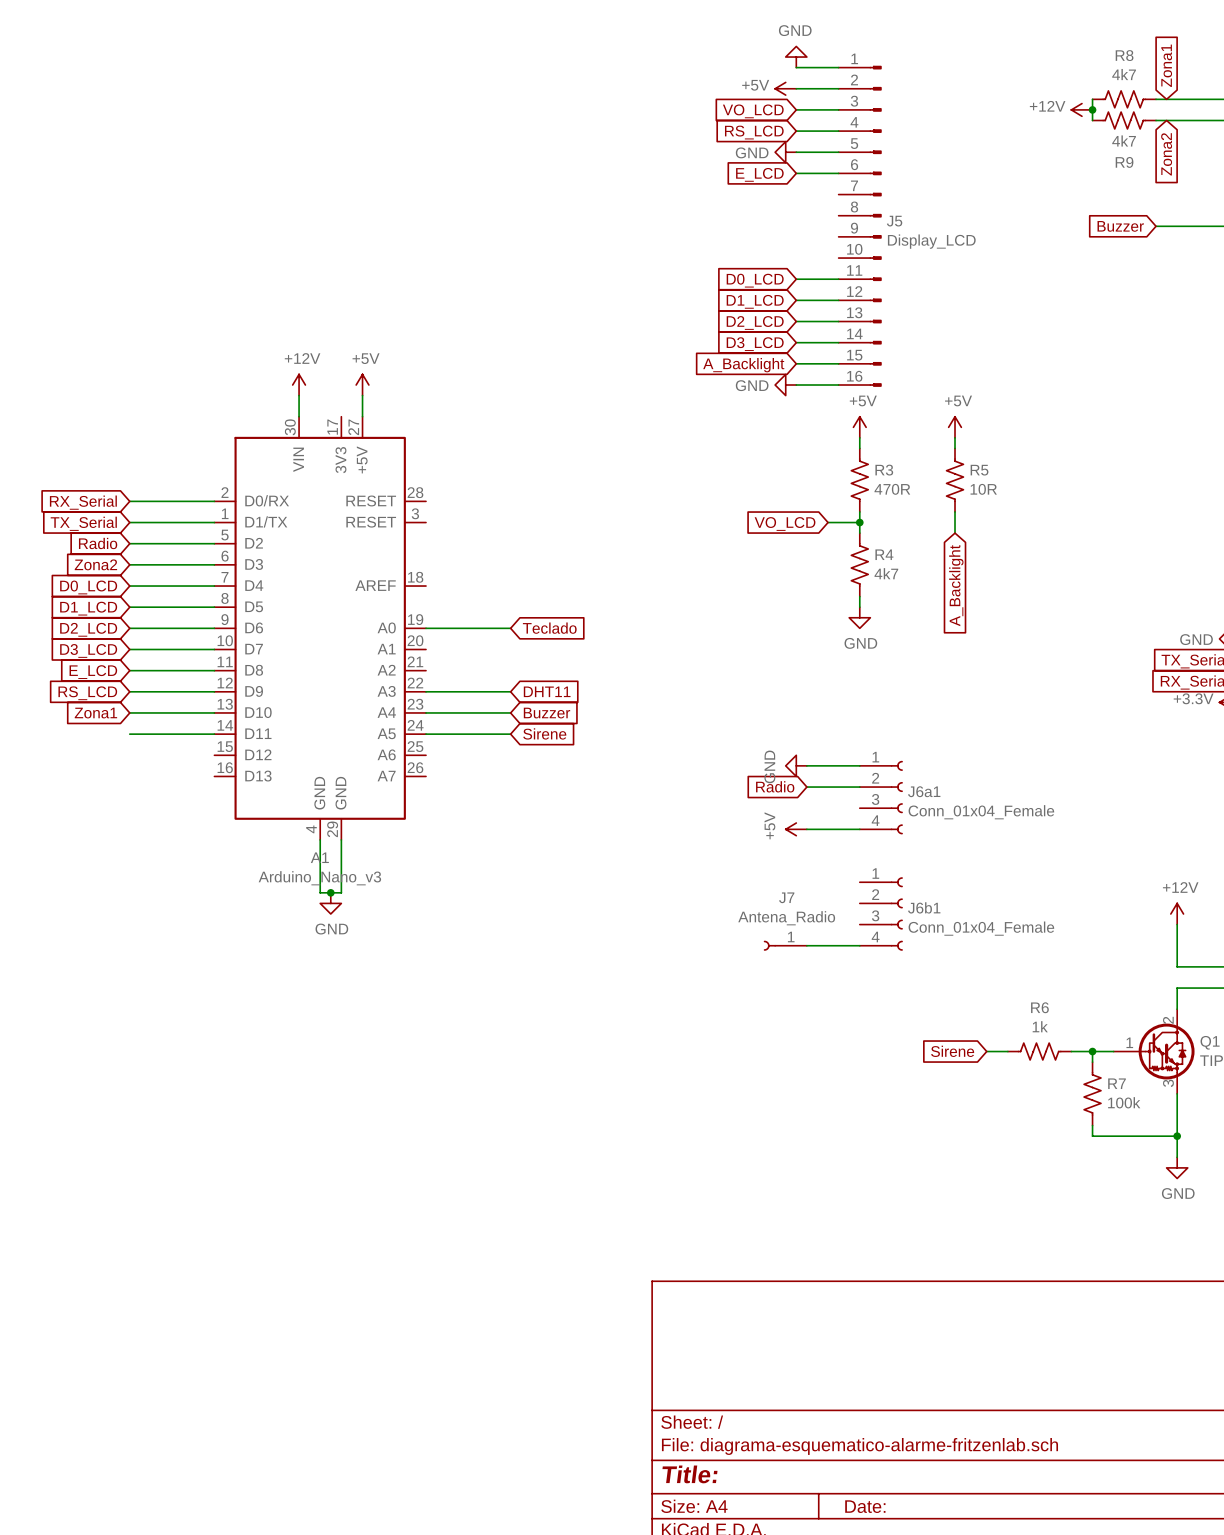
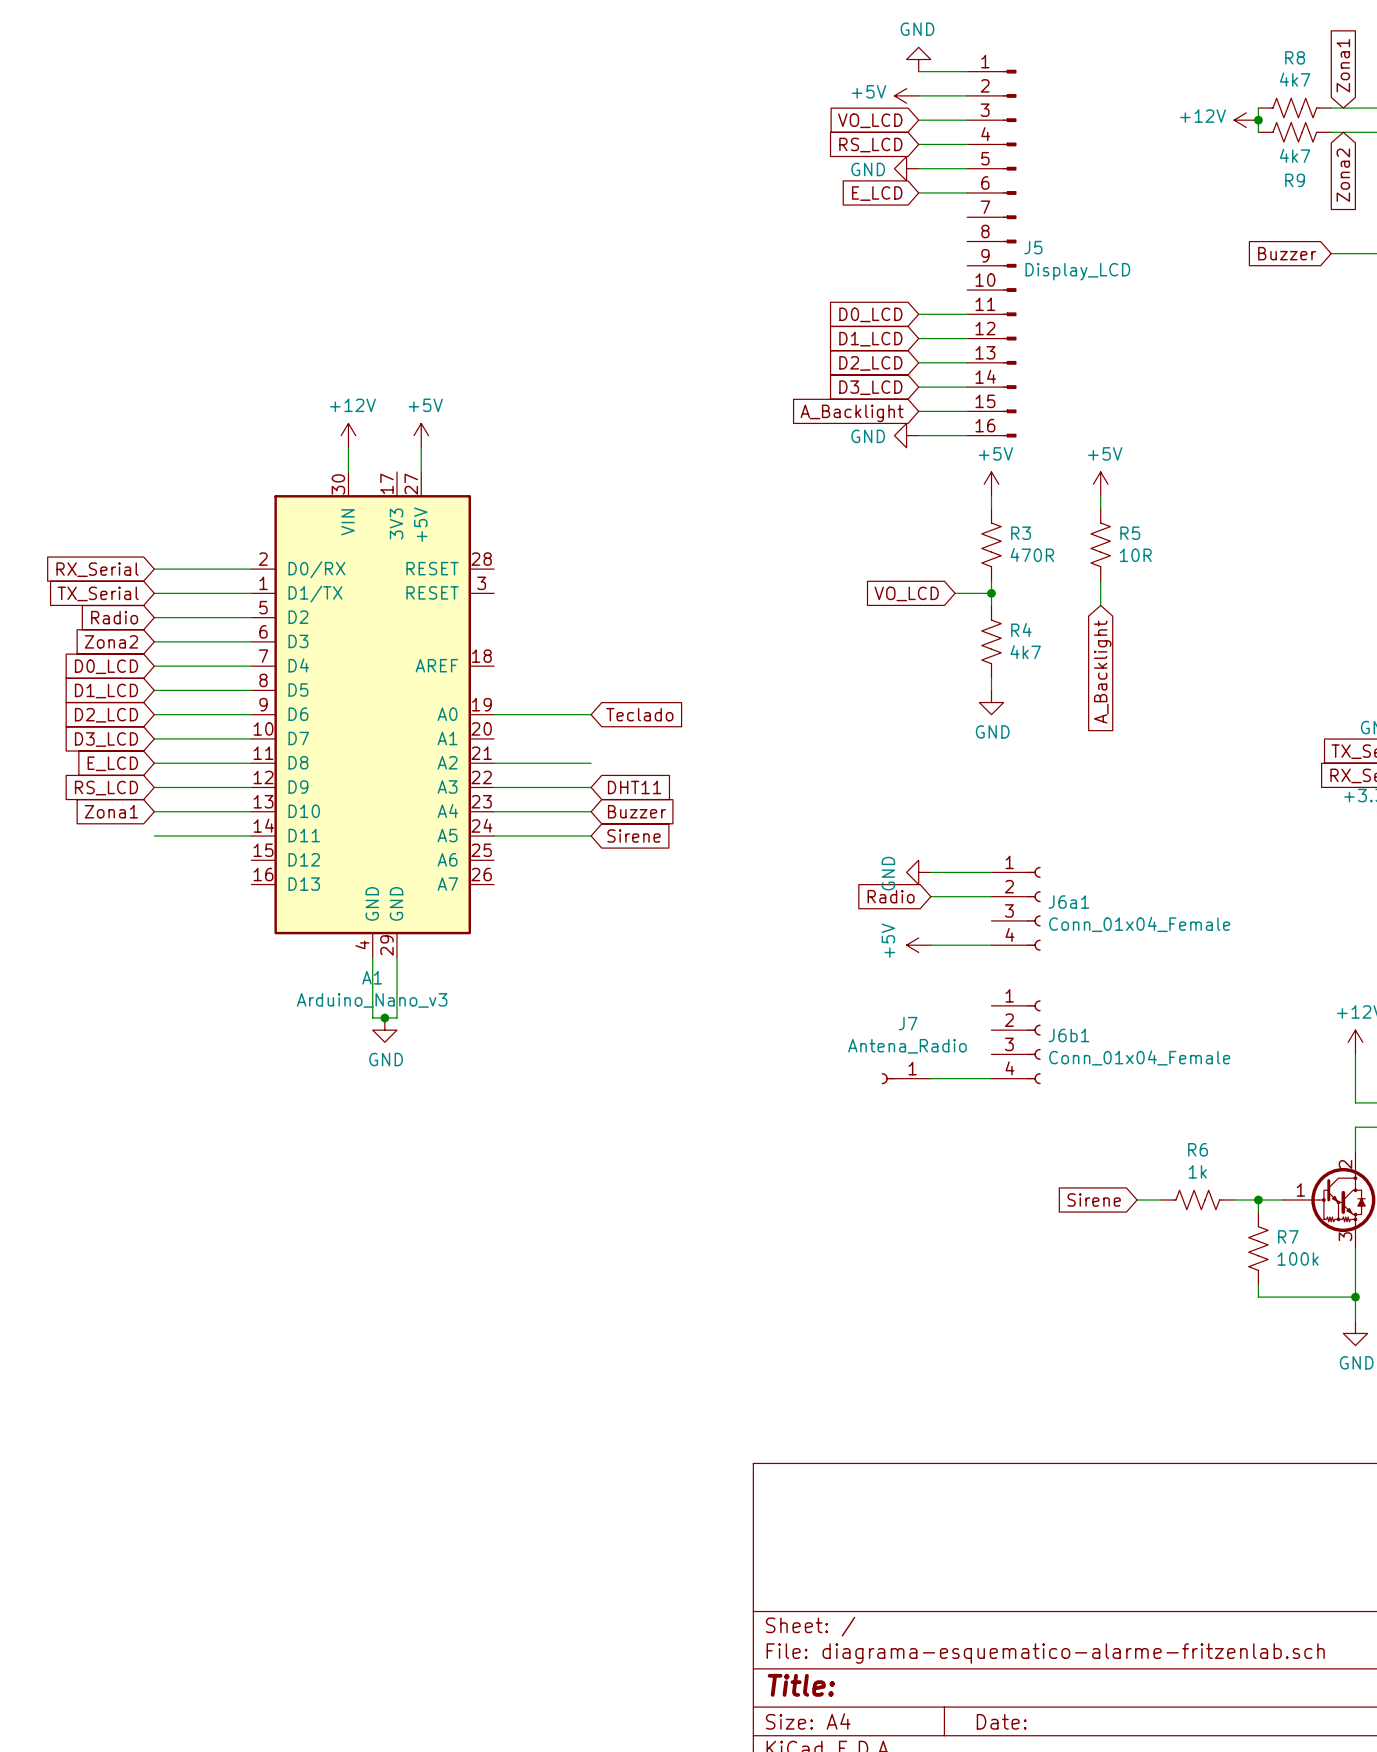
wire: none -> (494, 763) (591, 763)

